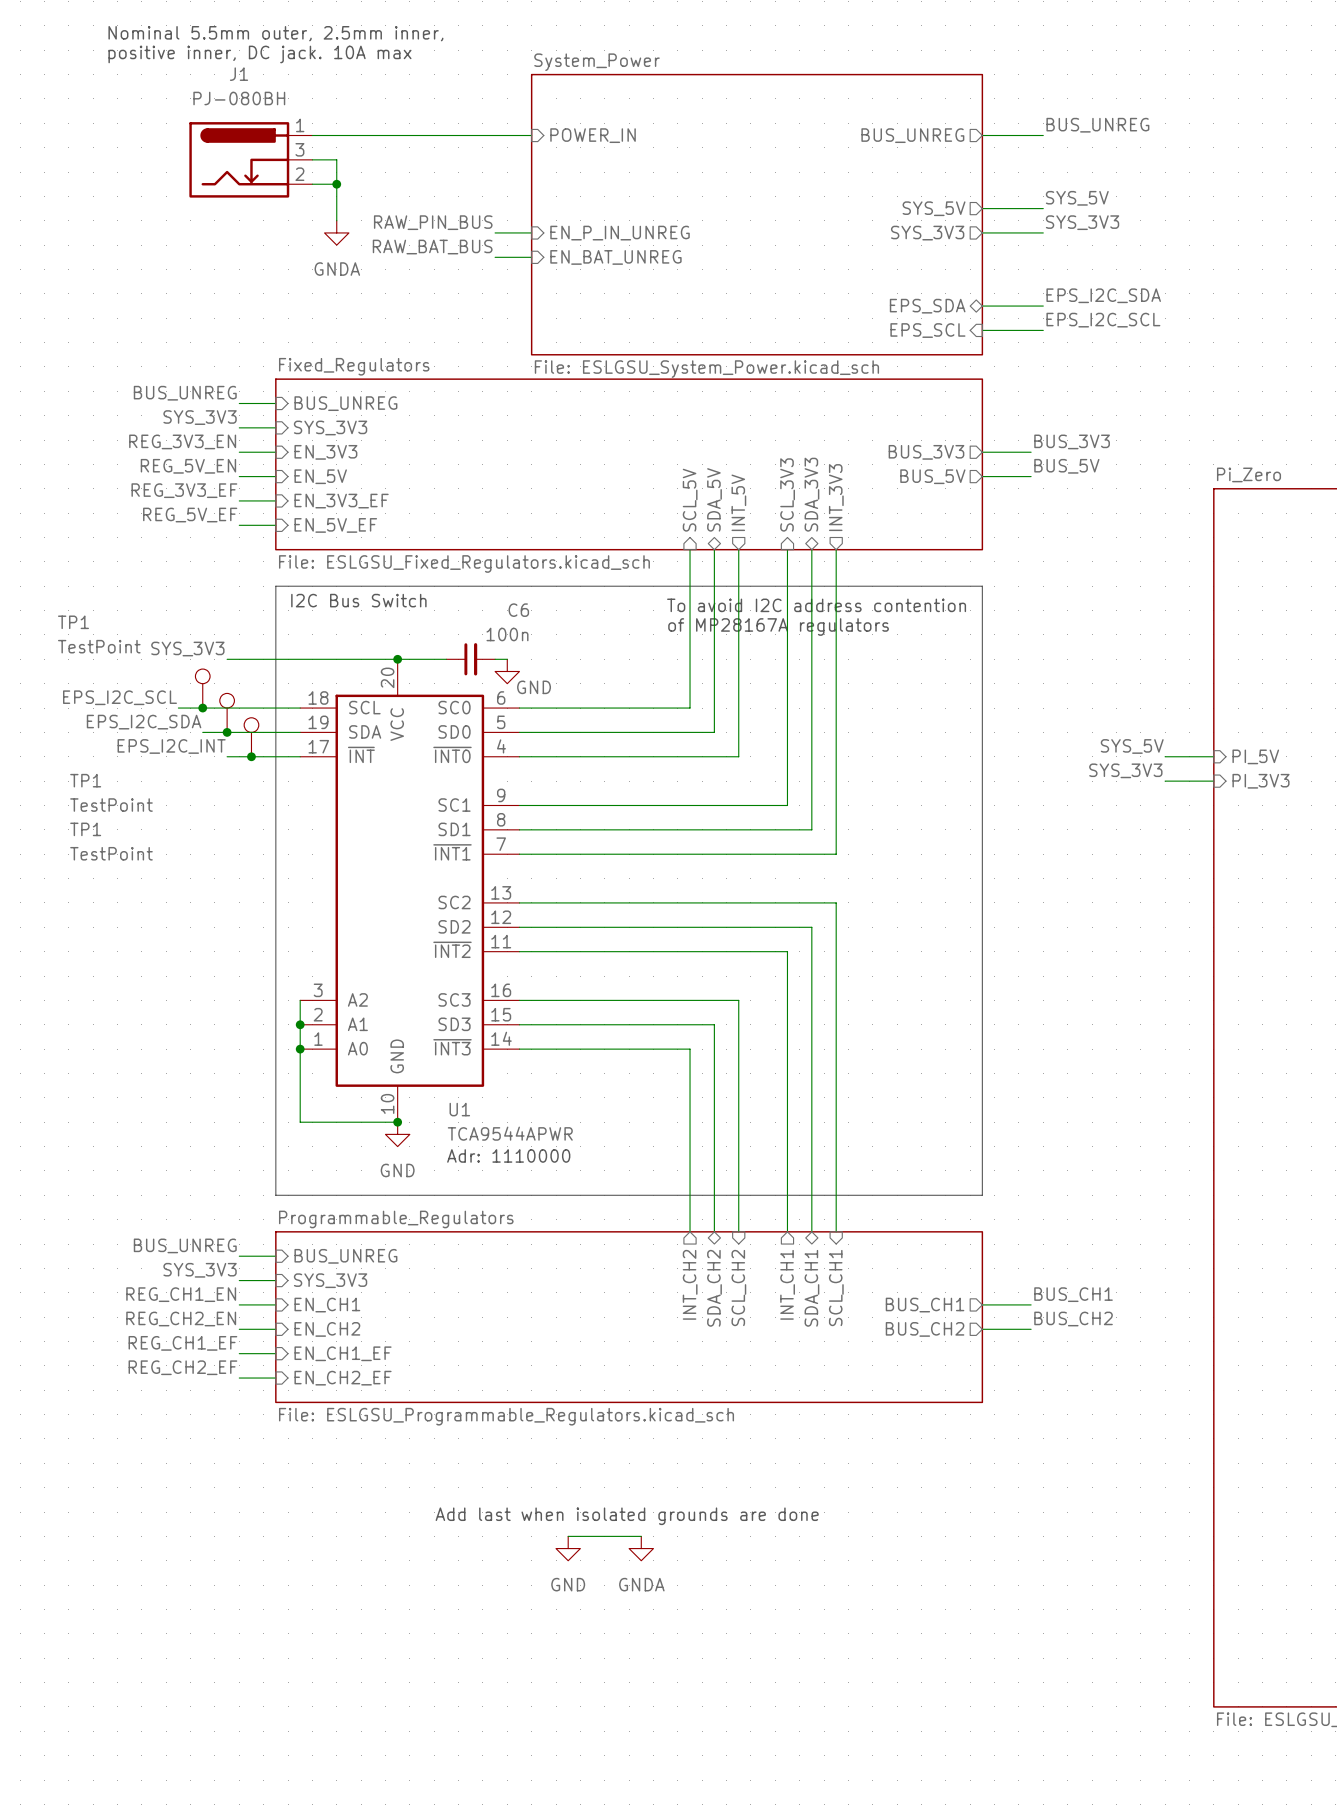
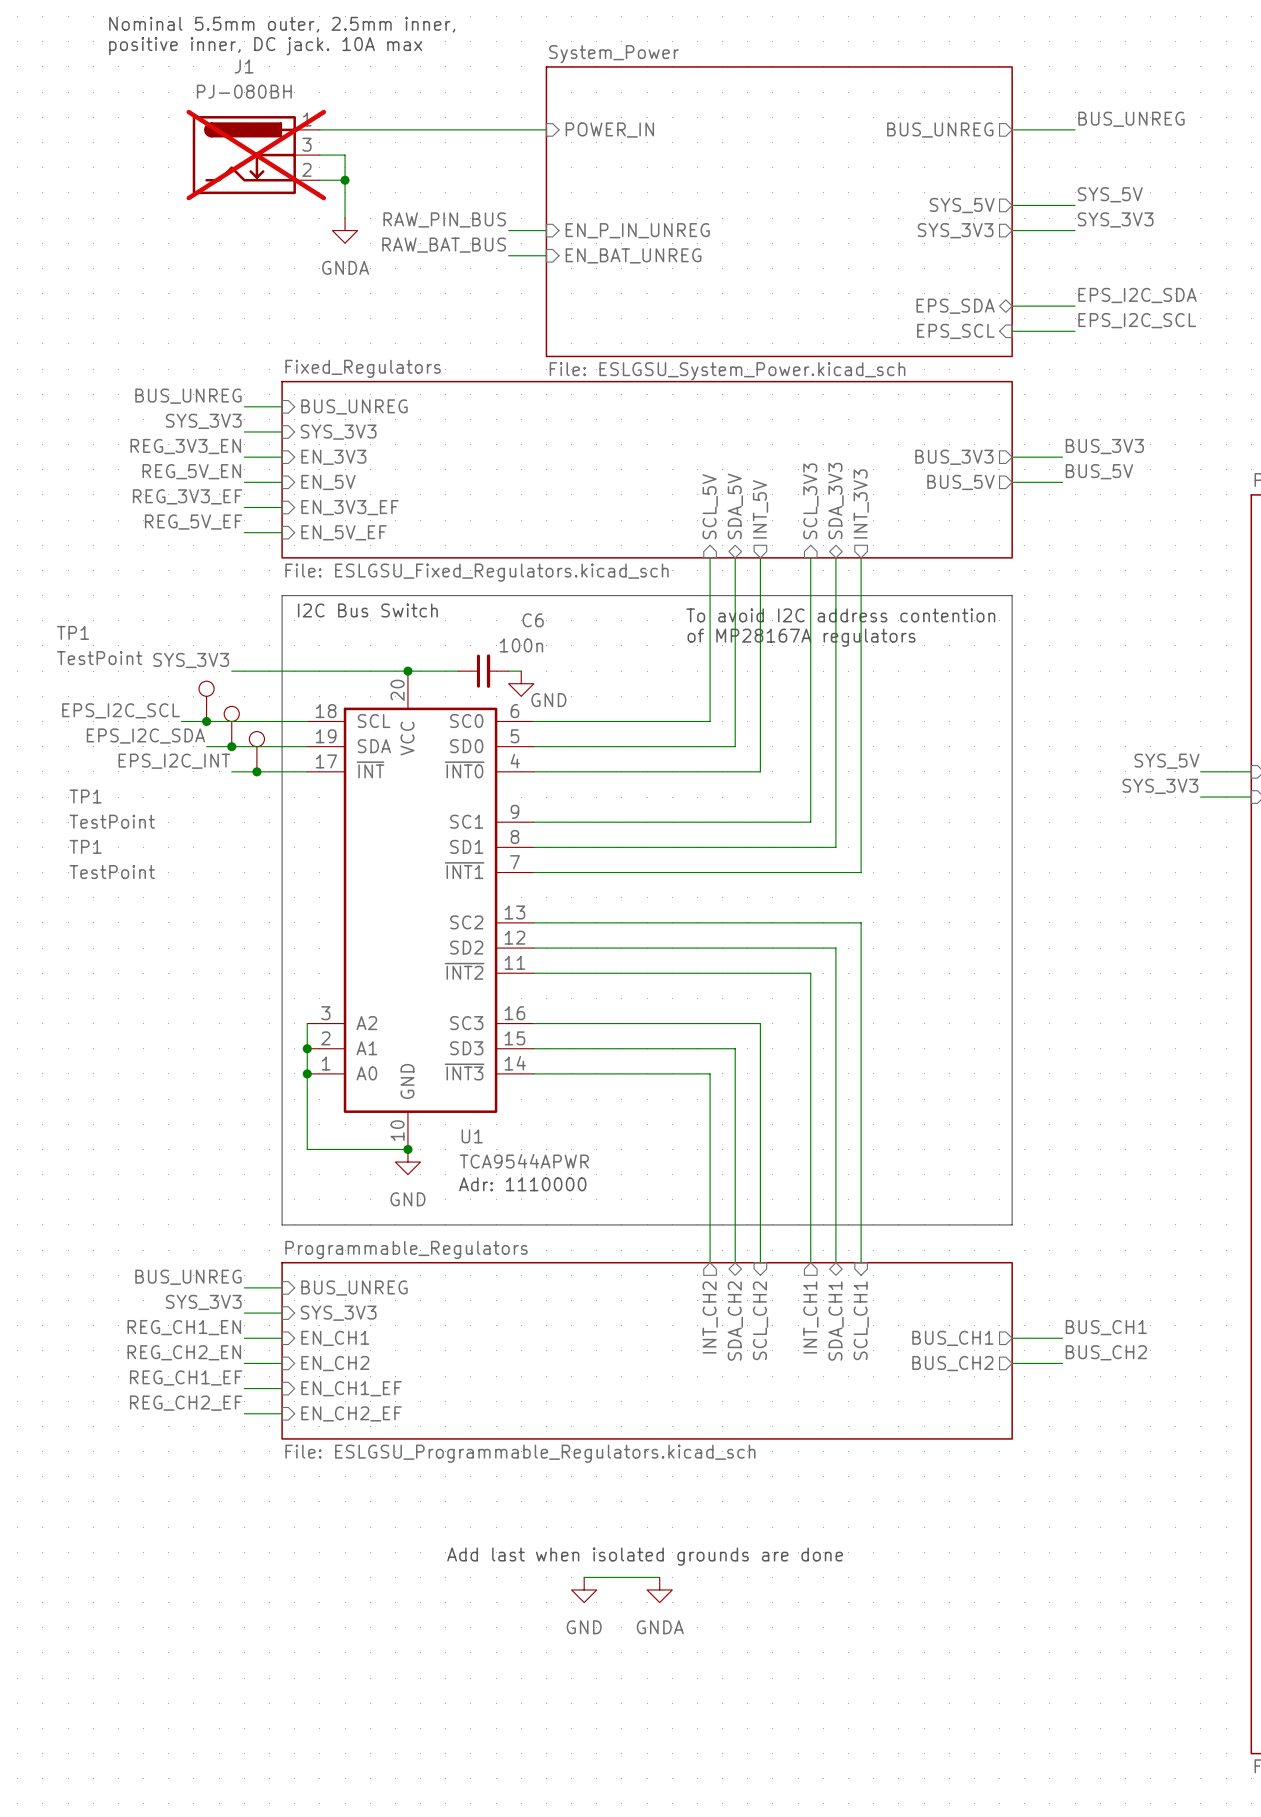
J1 do-not-place cross: none -> (256, 155)

